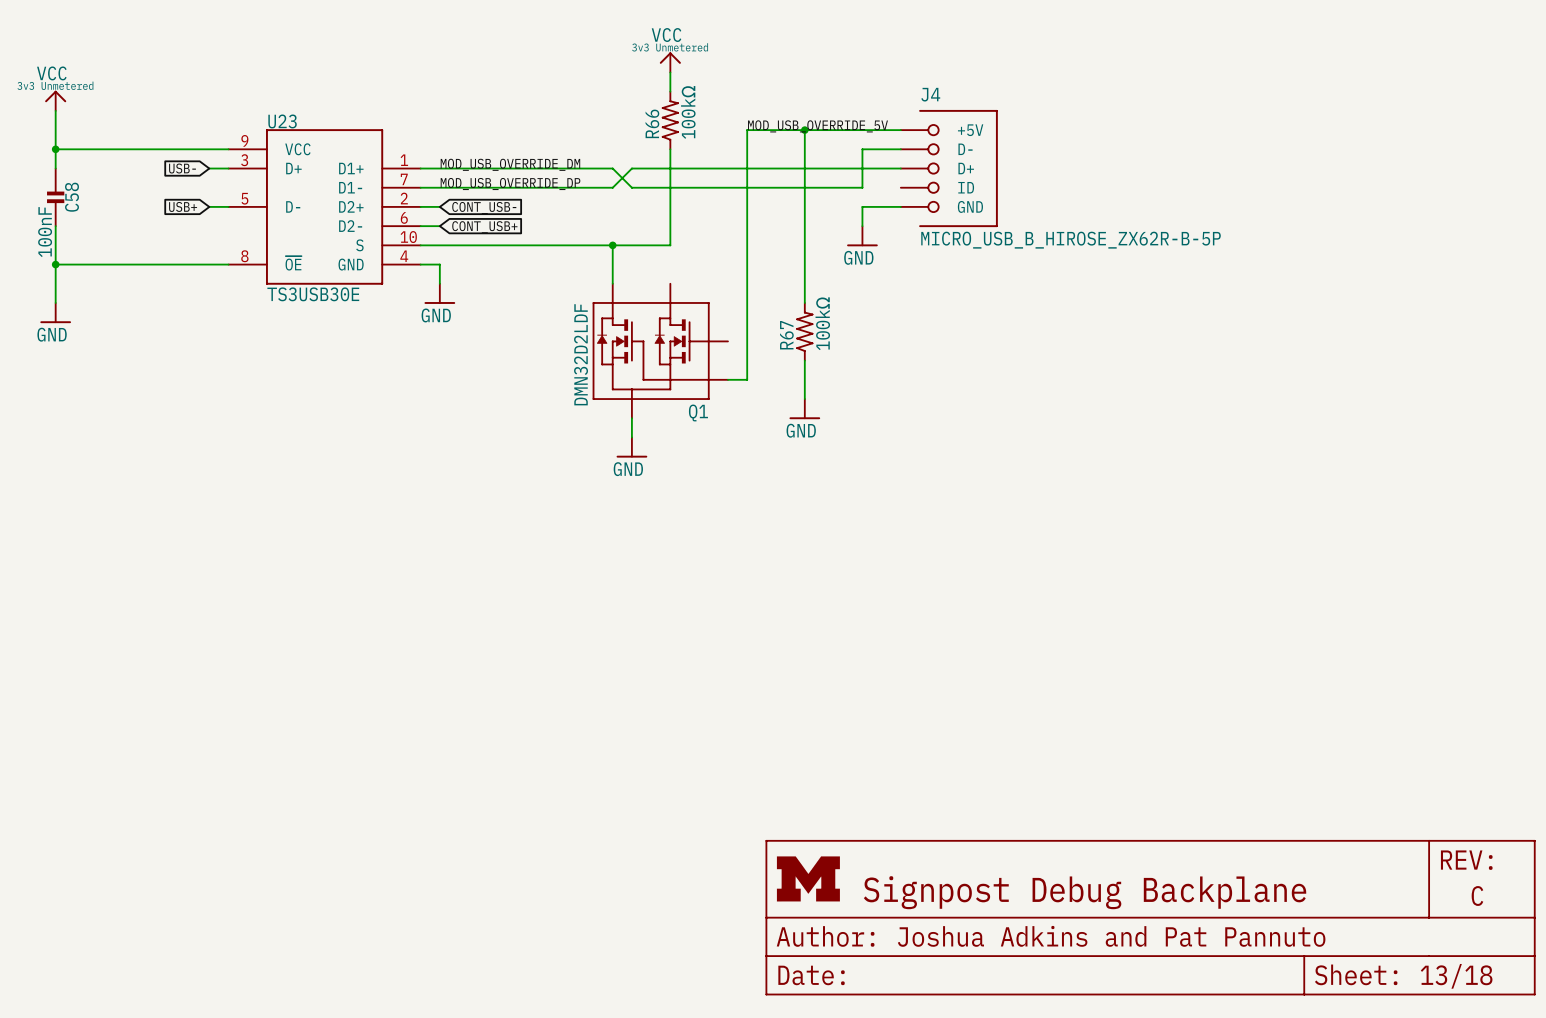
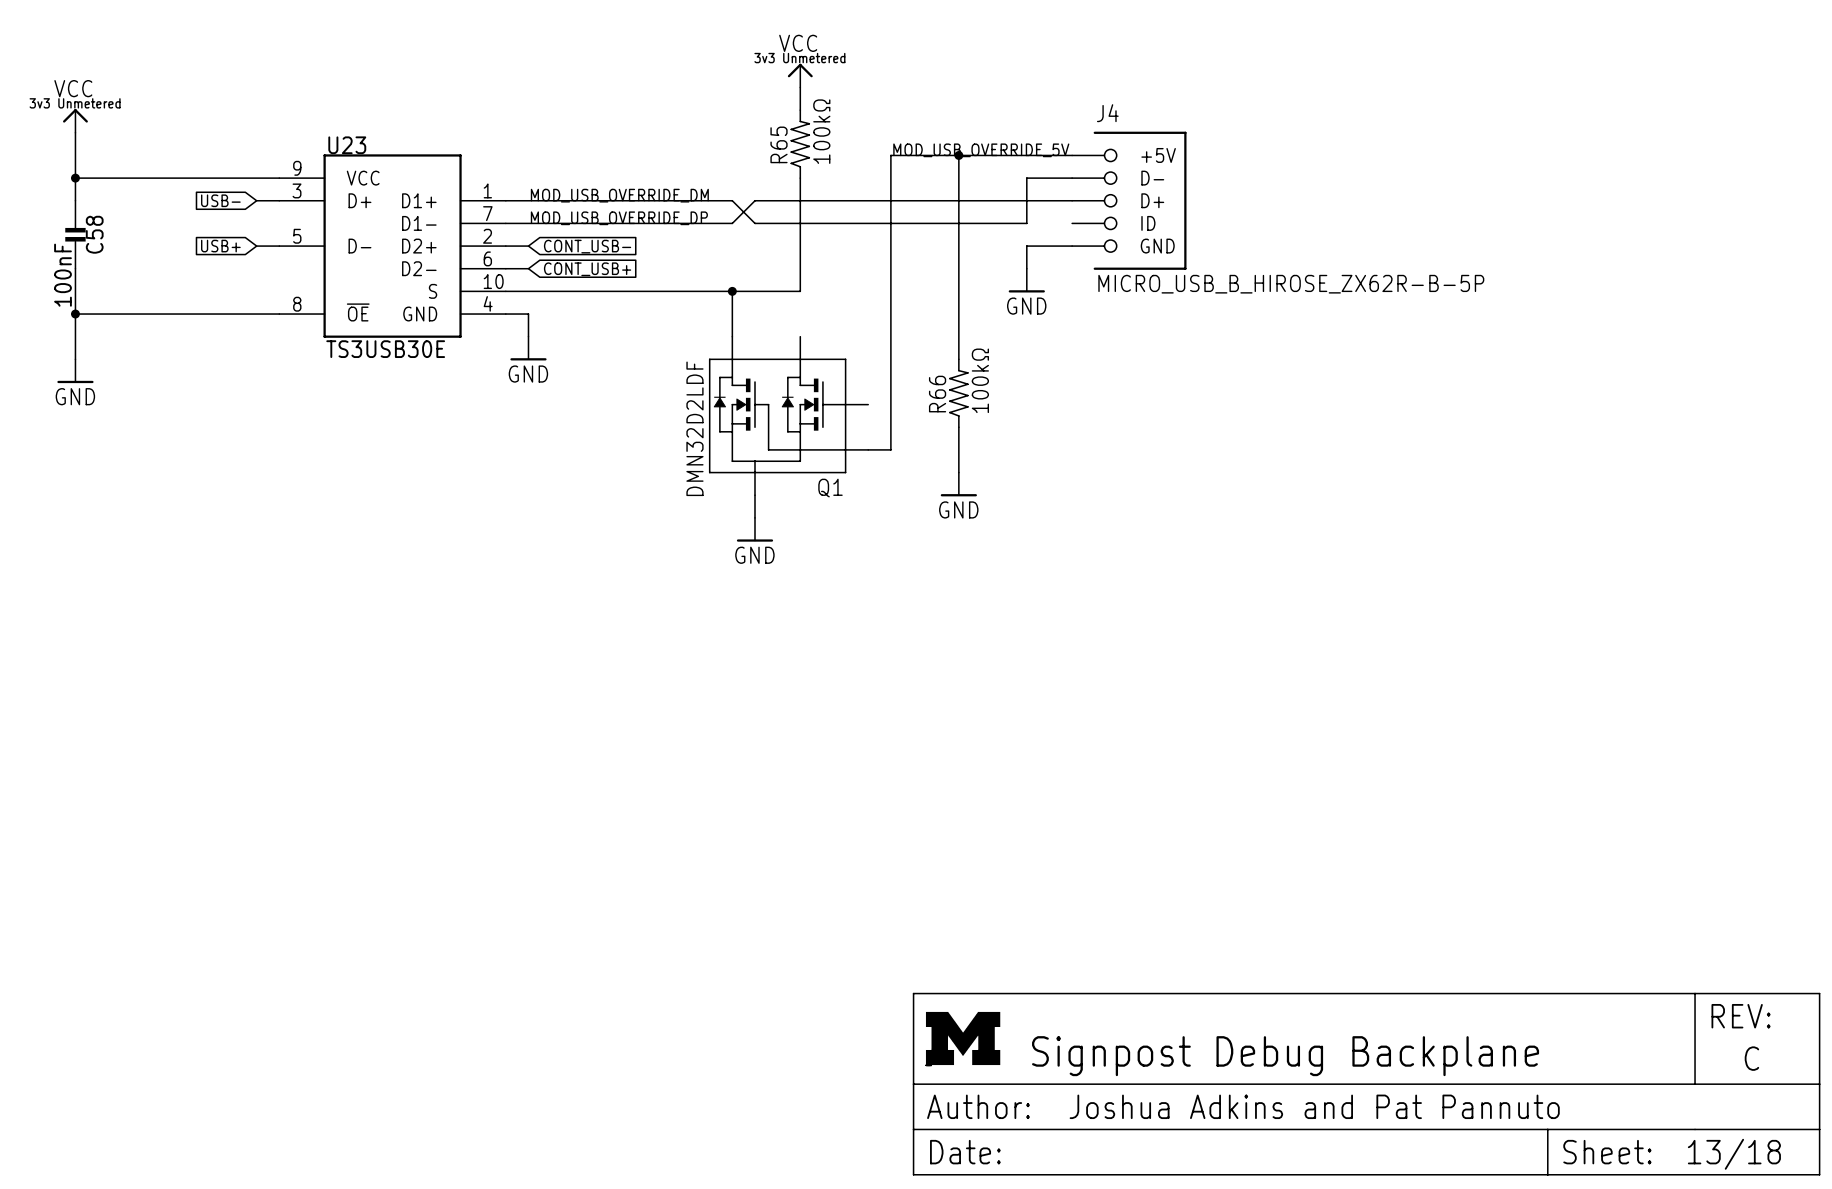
R66 name: R66 (652, 123) -> R65 (779, 144)
R67 name: R67 (786, 335) -> R66 (937, 394)

